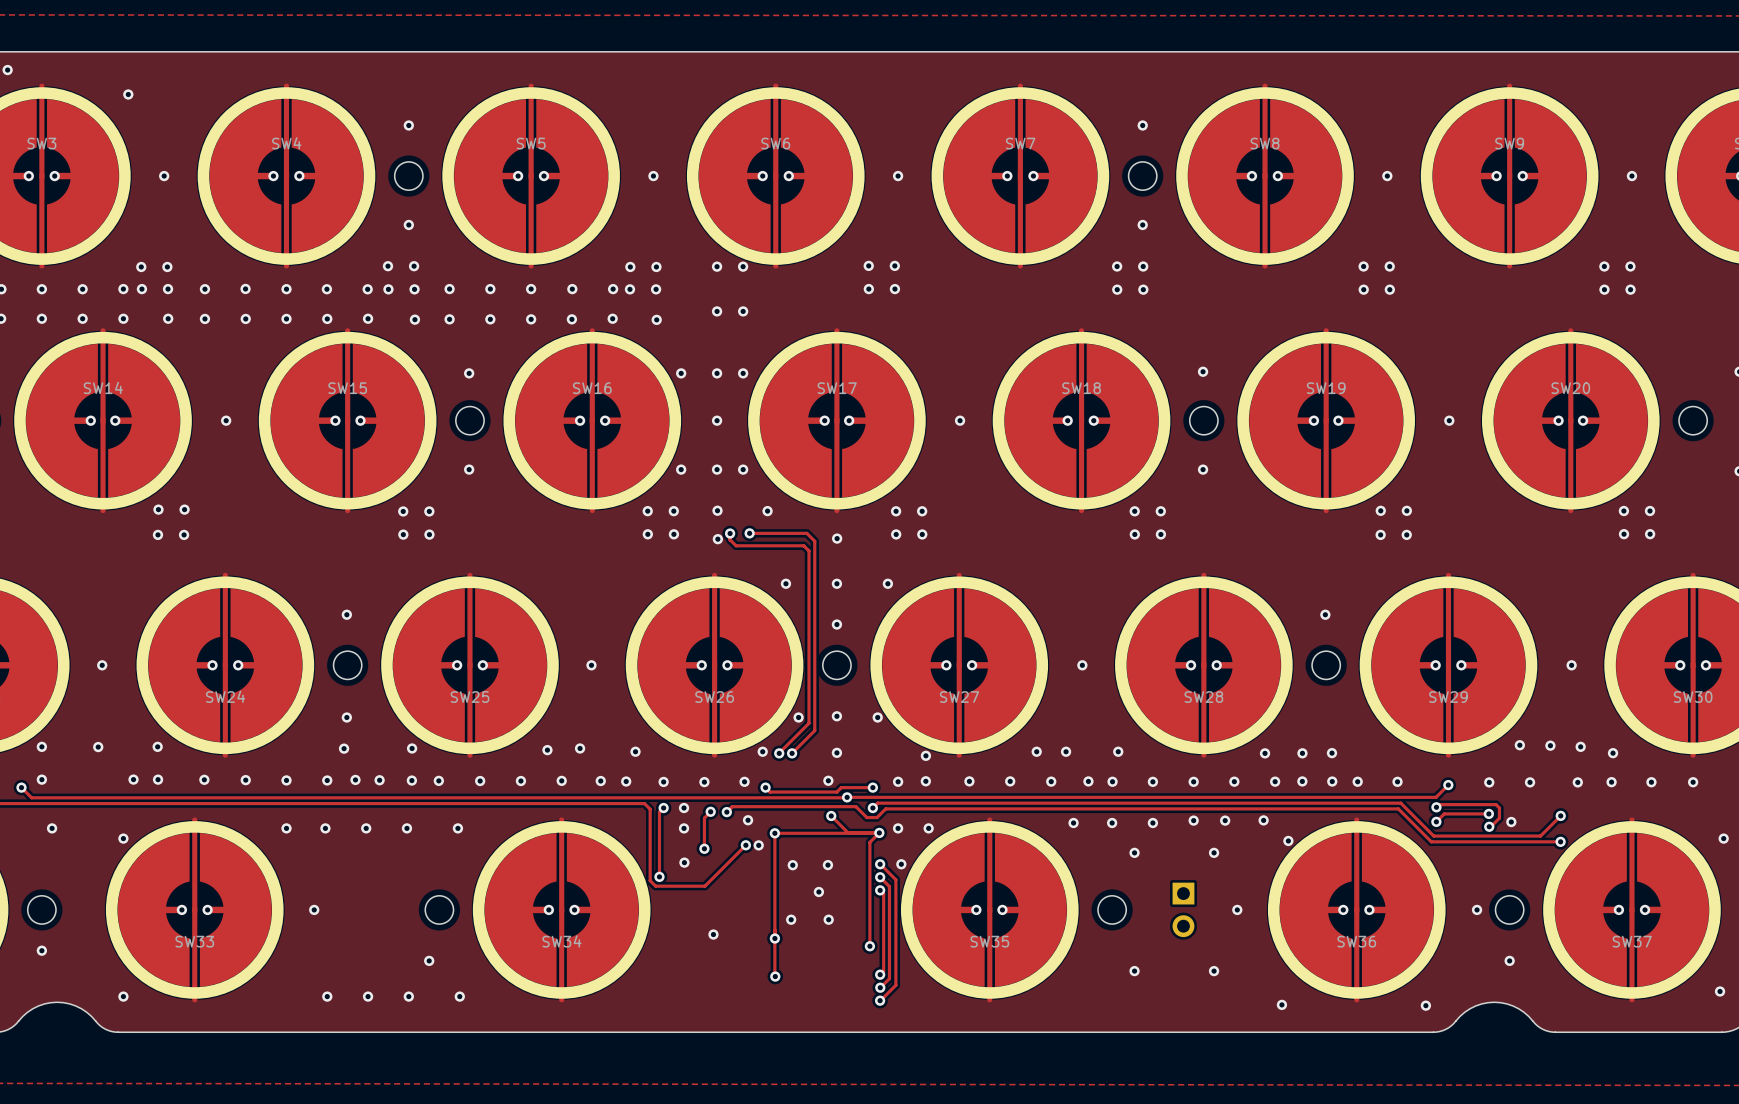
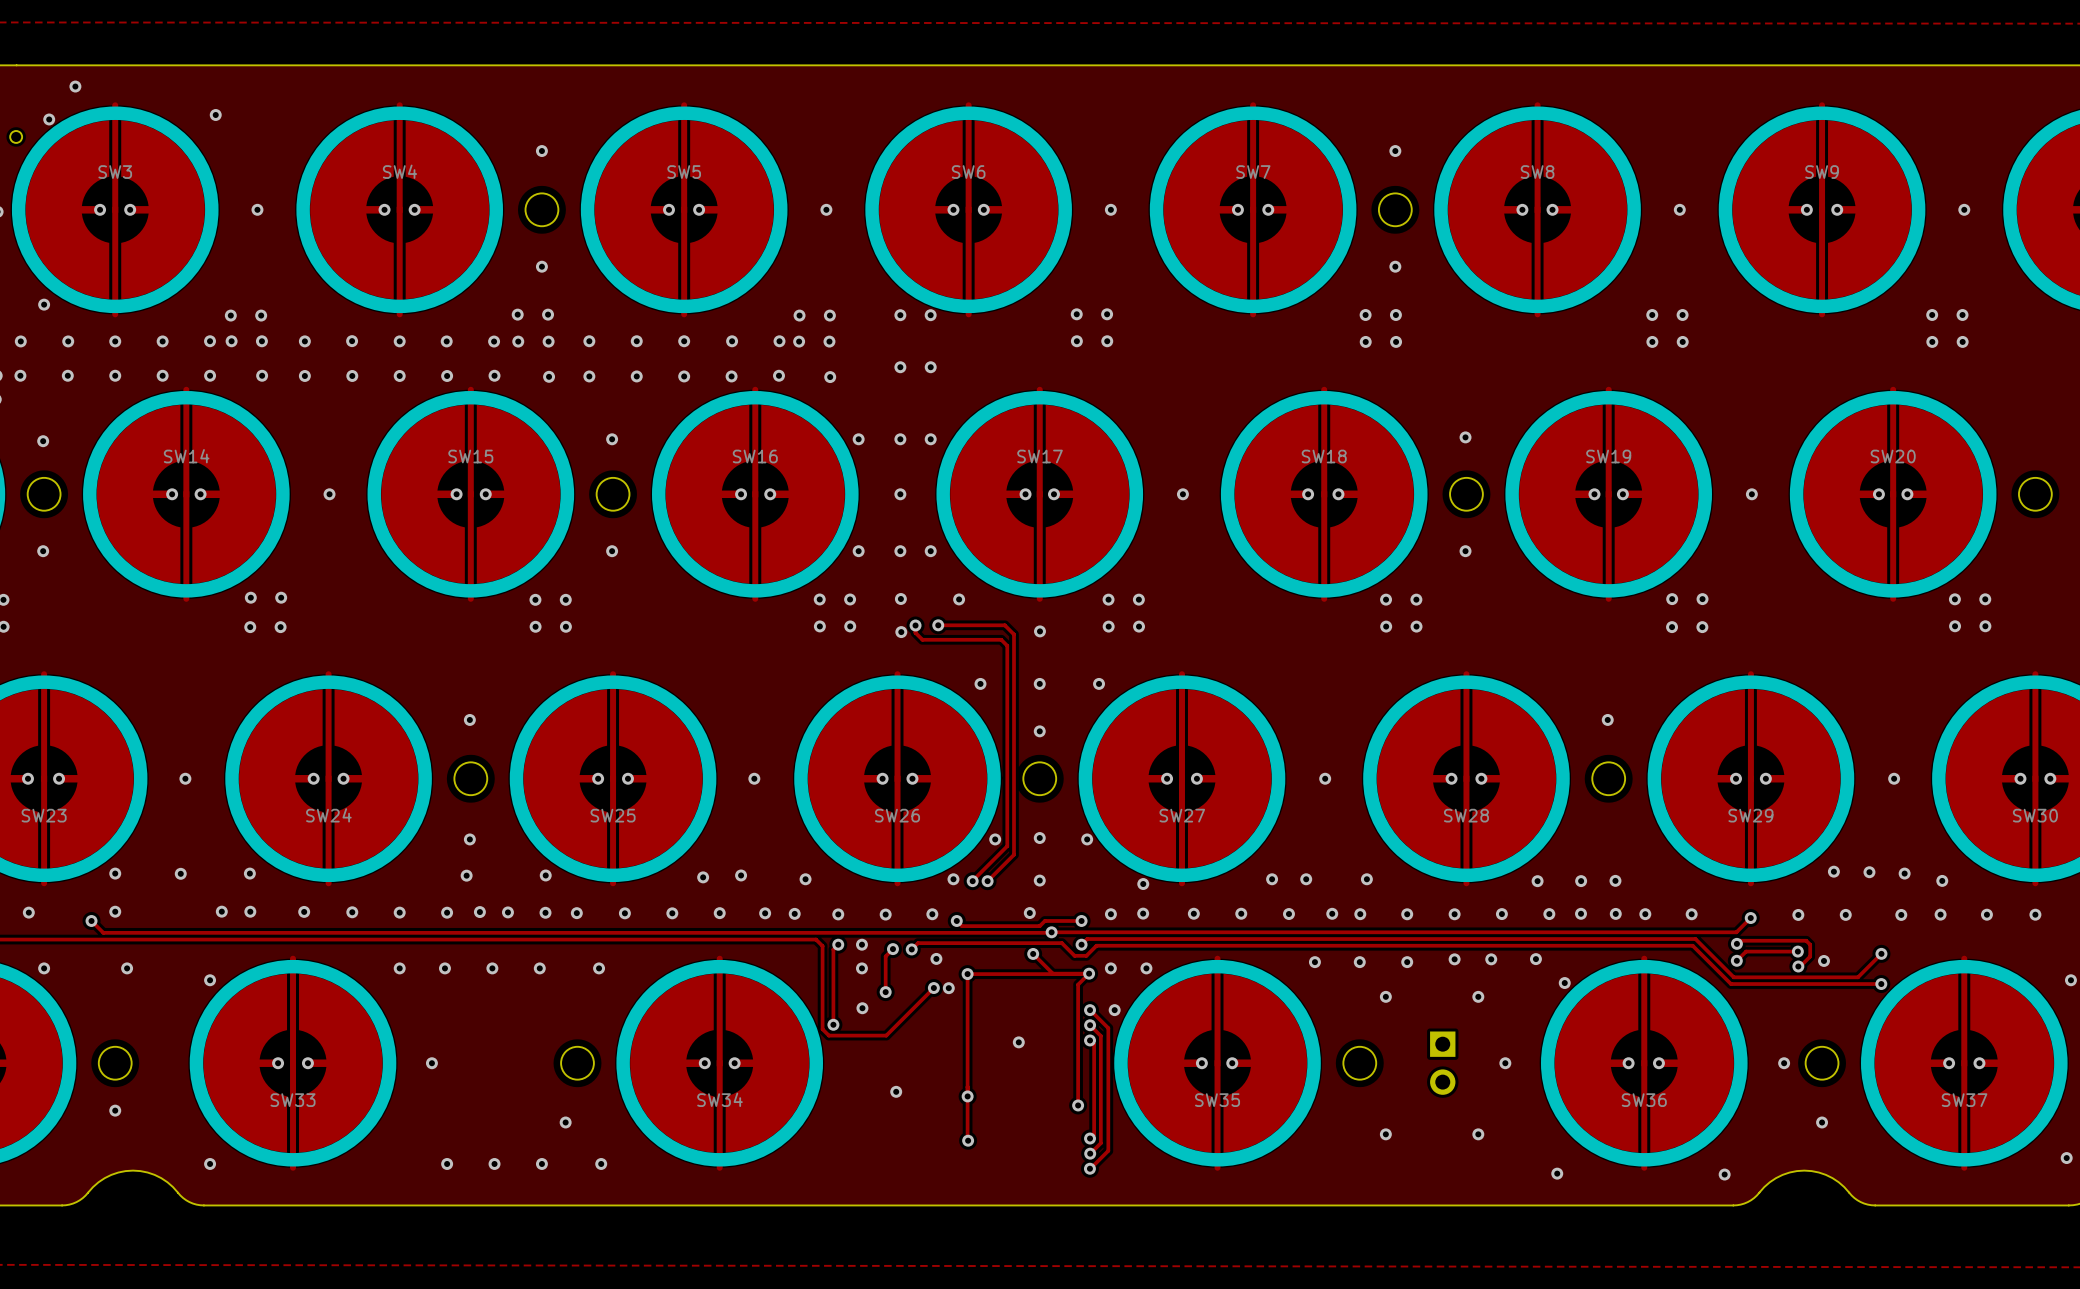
via: (792, 865) -> none
via: (827, 865) -> none
via: (791, 919) -> none
via: (828, 919) -> none

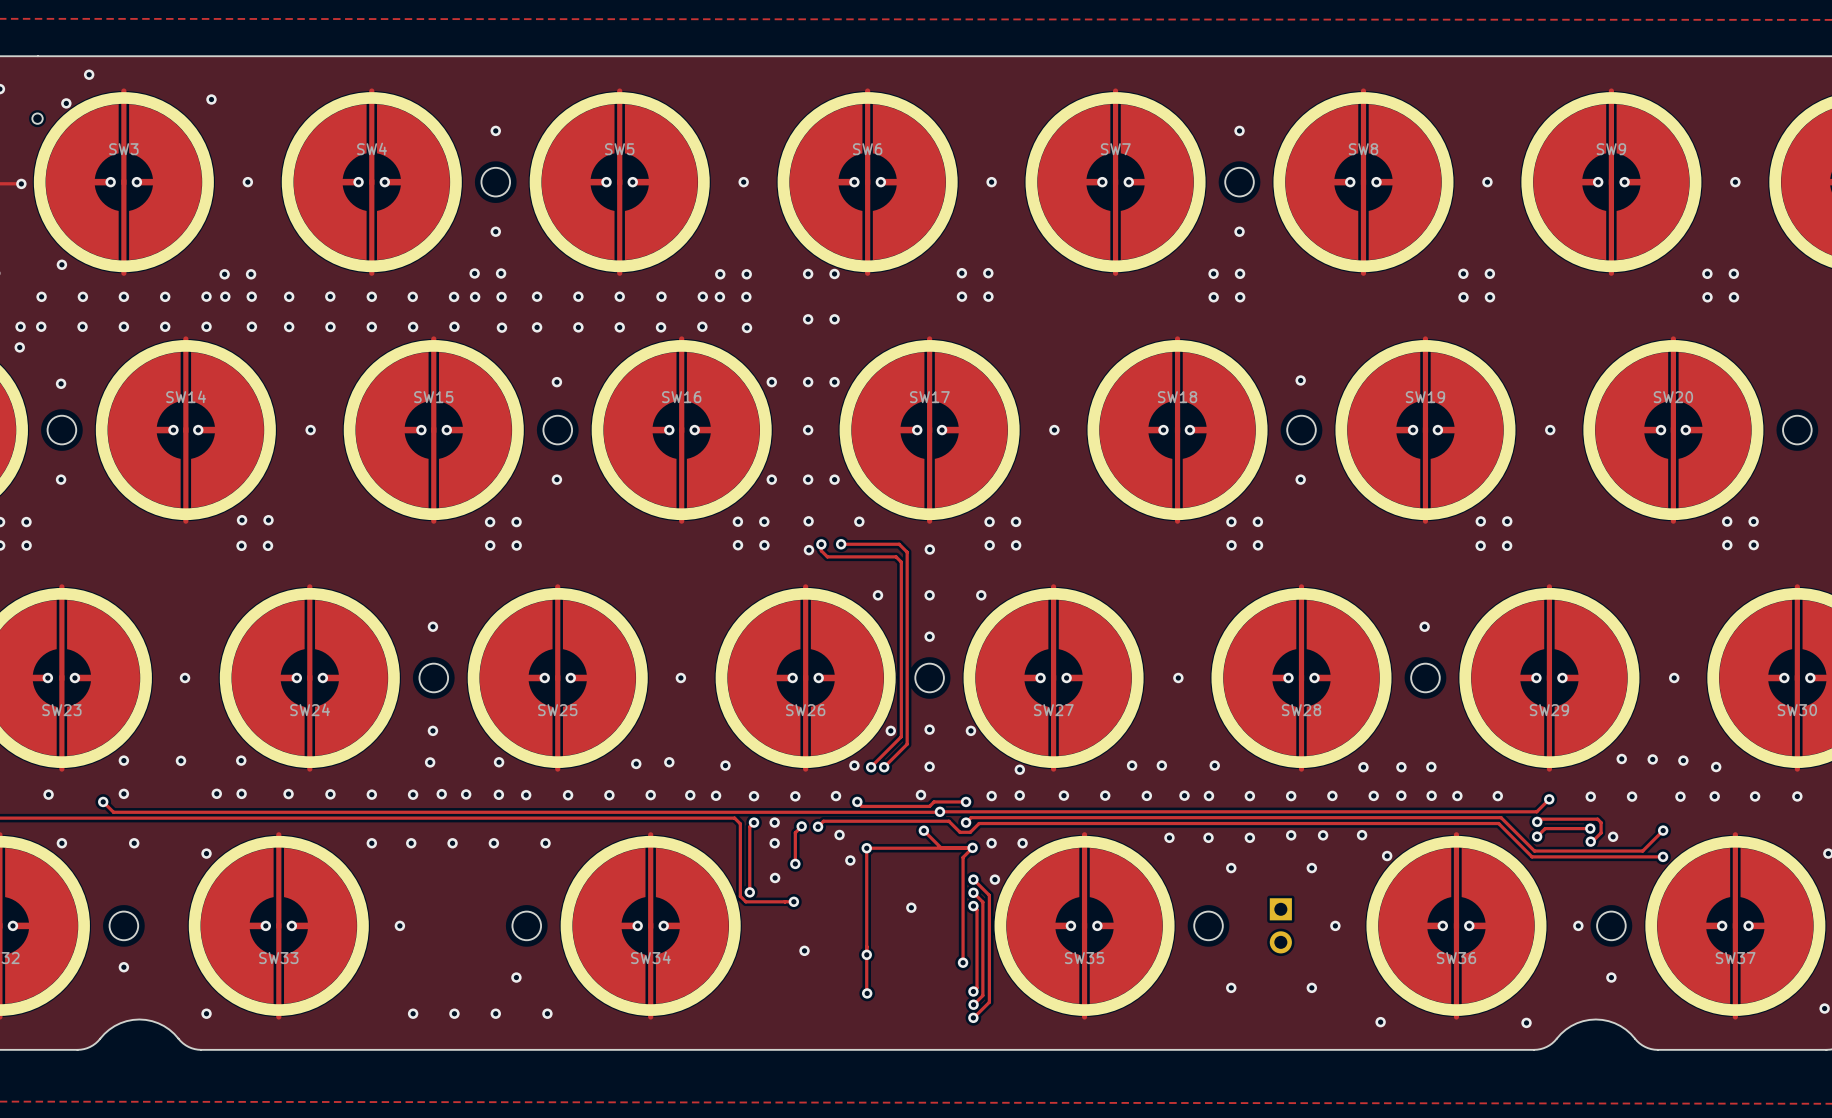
track: (933, 988) (886, 1035) (883, 1035) -> none
via position: (933, 988) -> (793, 901)

